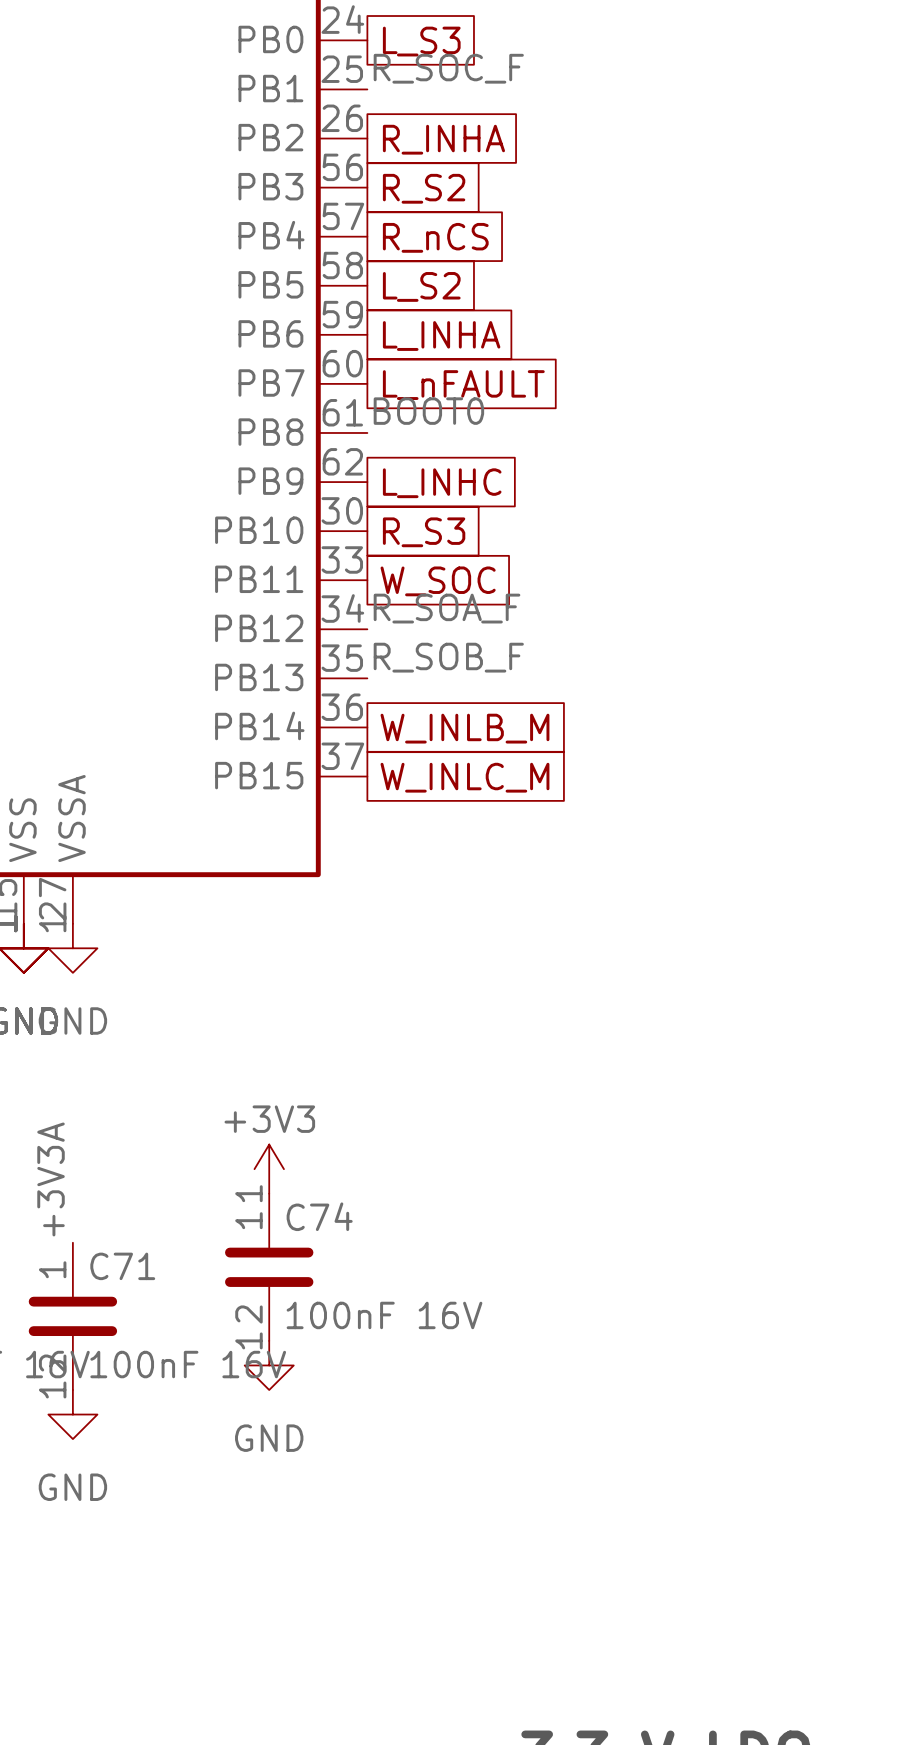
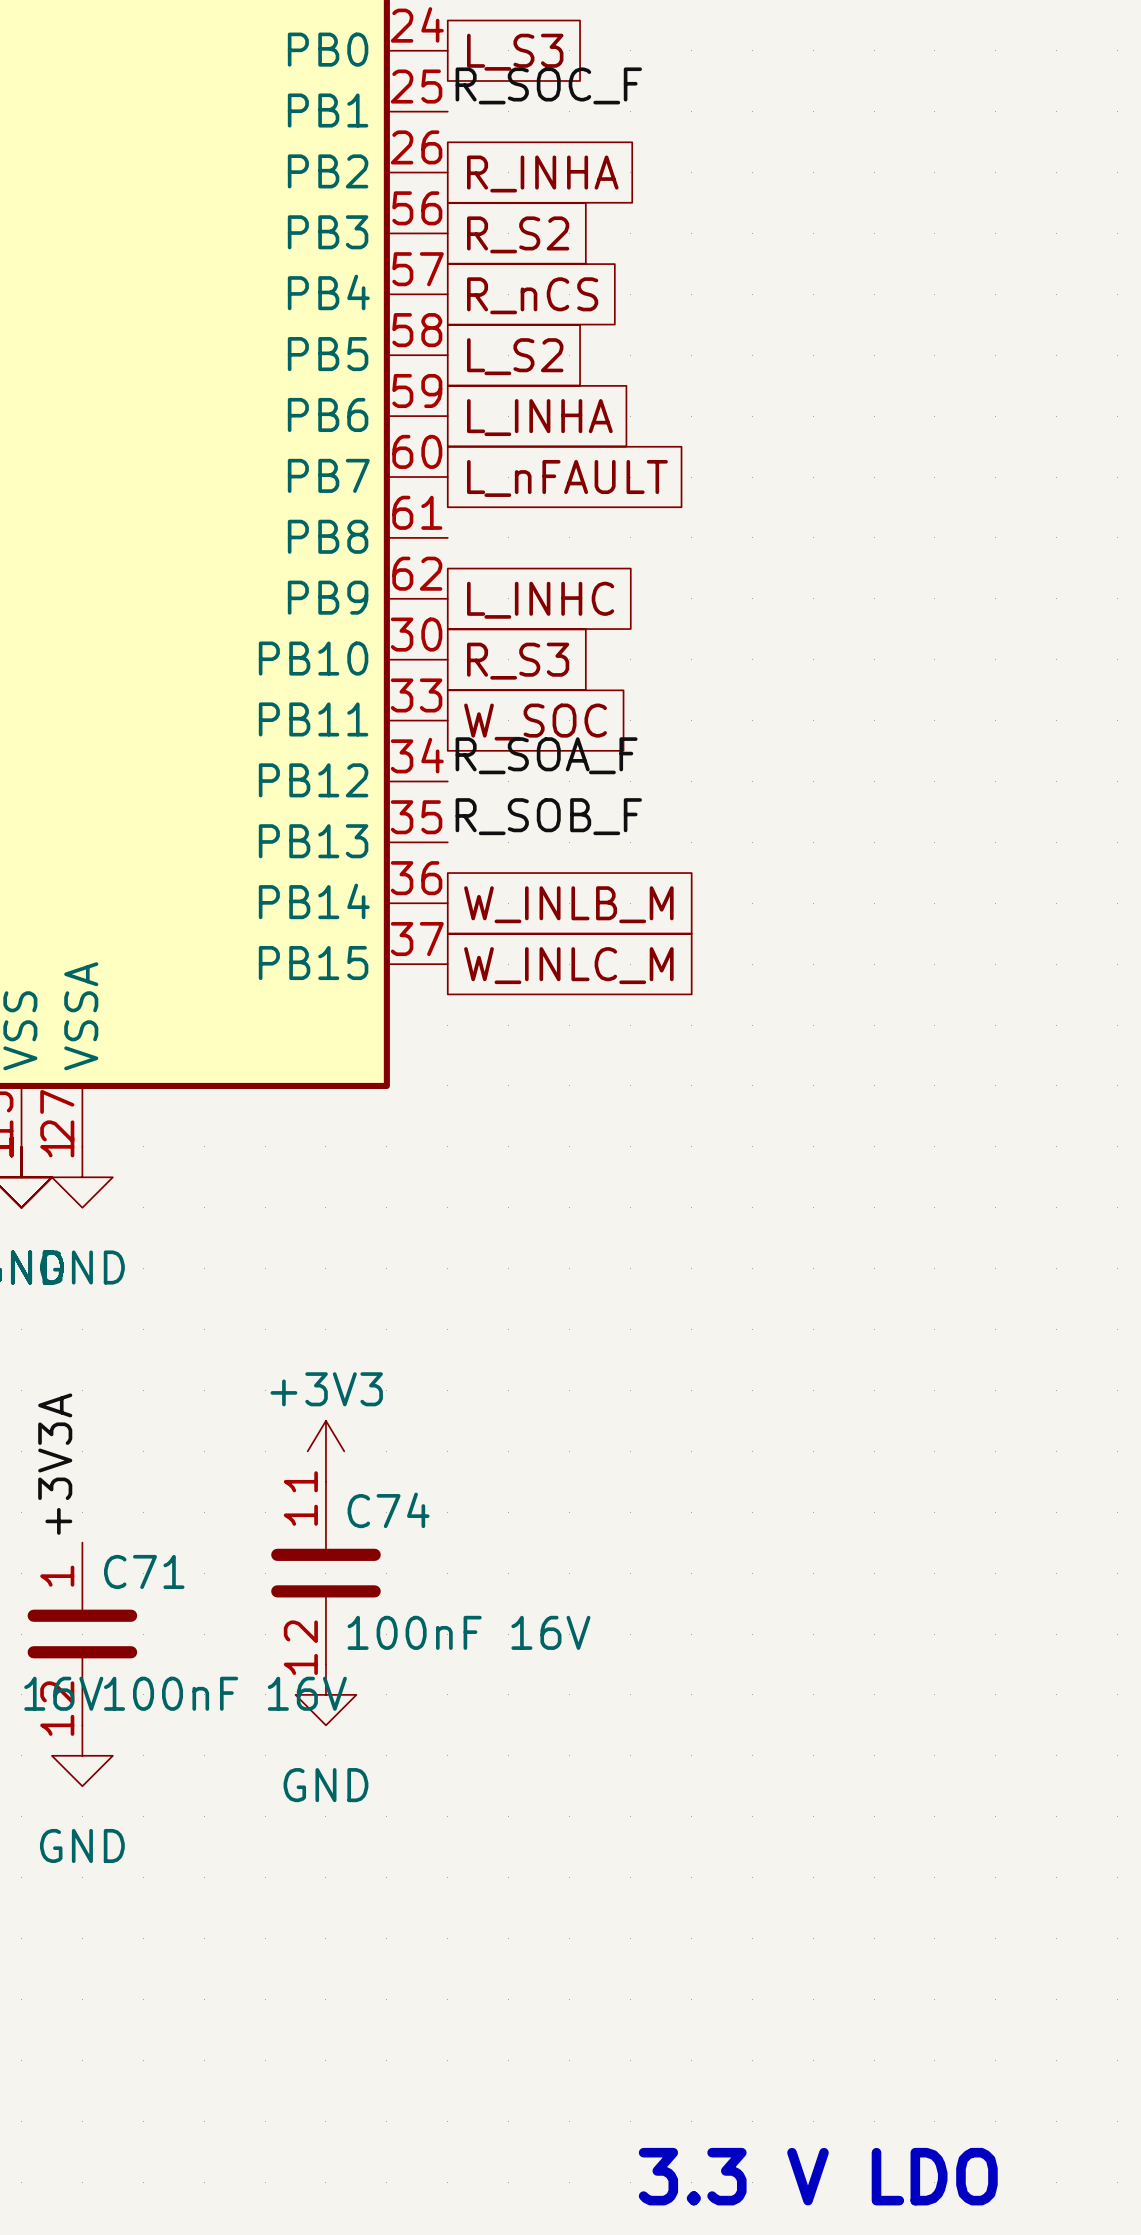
label: BOOT0 (428, 411) -> none

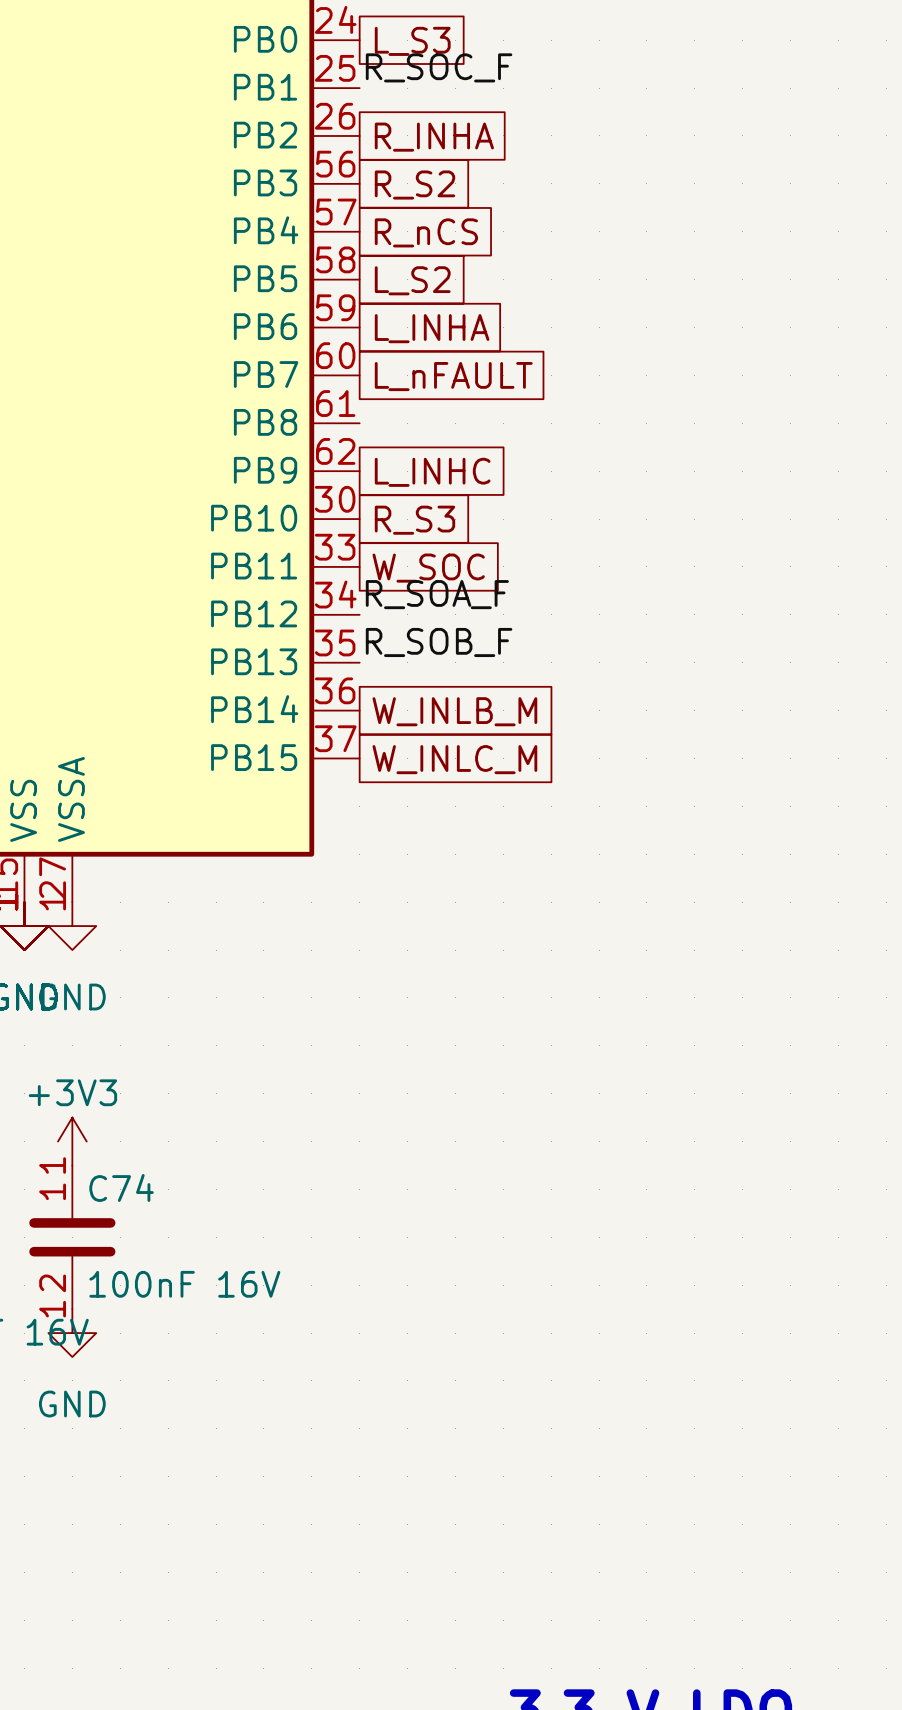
power symbol position: +3V3 (325, 1451) -> +3V3 (72, 1141)
label: +3V3A (55, 1464) -> none
C74 position: (325, 1573) -> (72, 1237)
C71: 100nF 16V (82, 1634) -> none
power symbol: GND (325, 1694) -> none
power symbol position: GND (82, 1755) -> GND (72, 1333)

